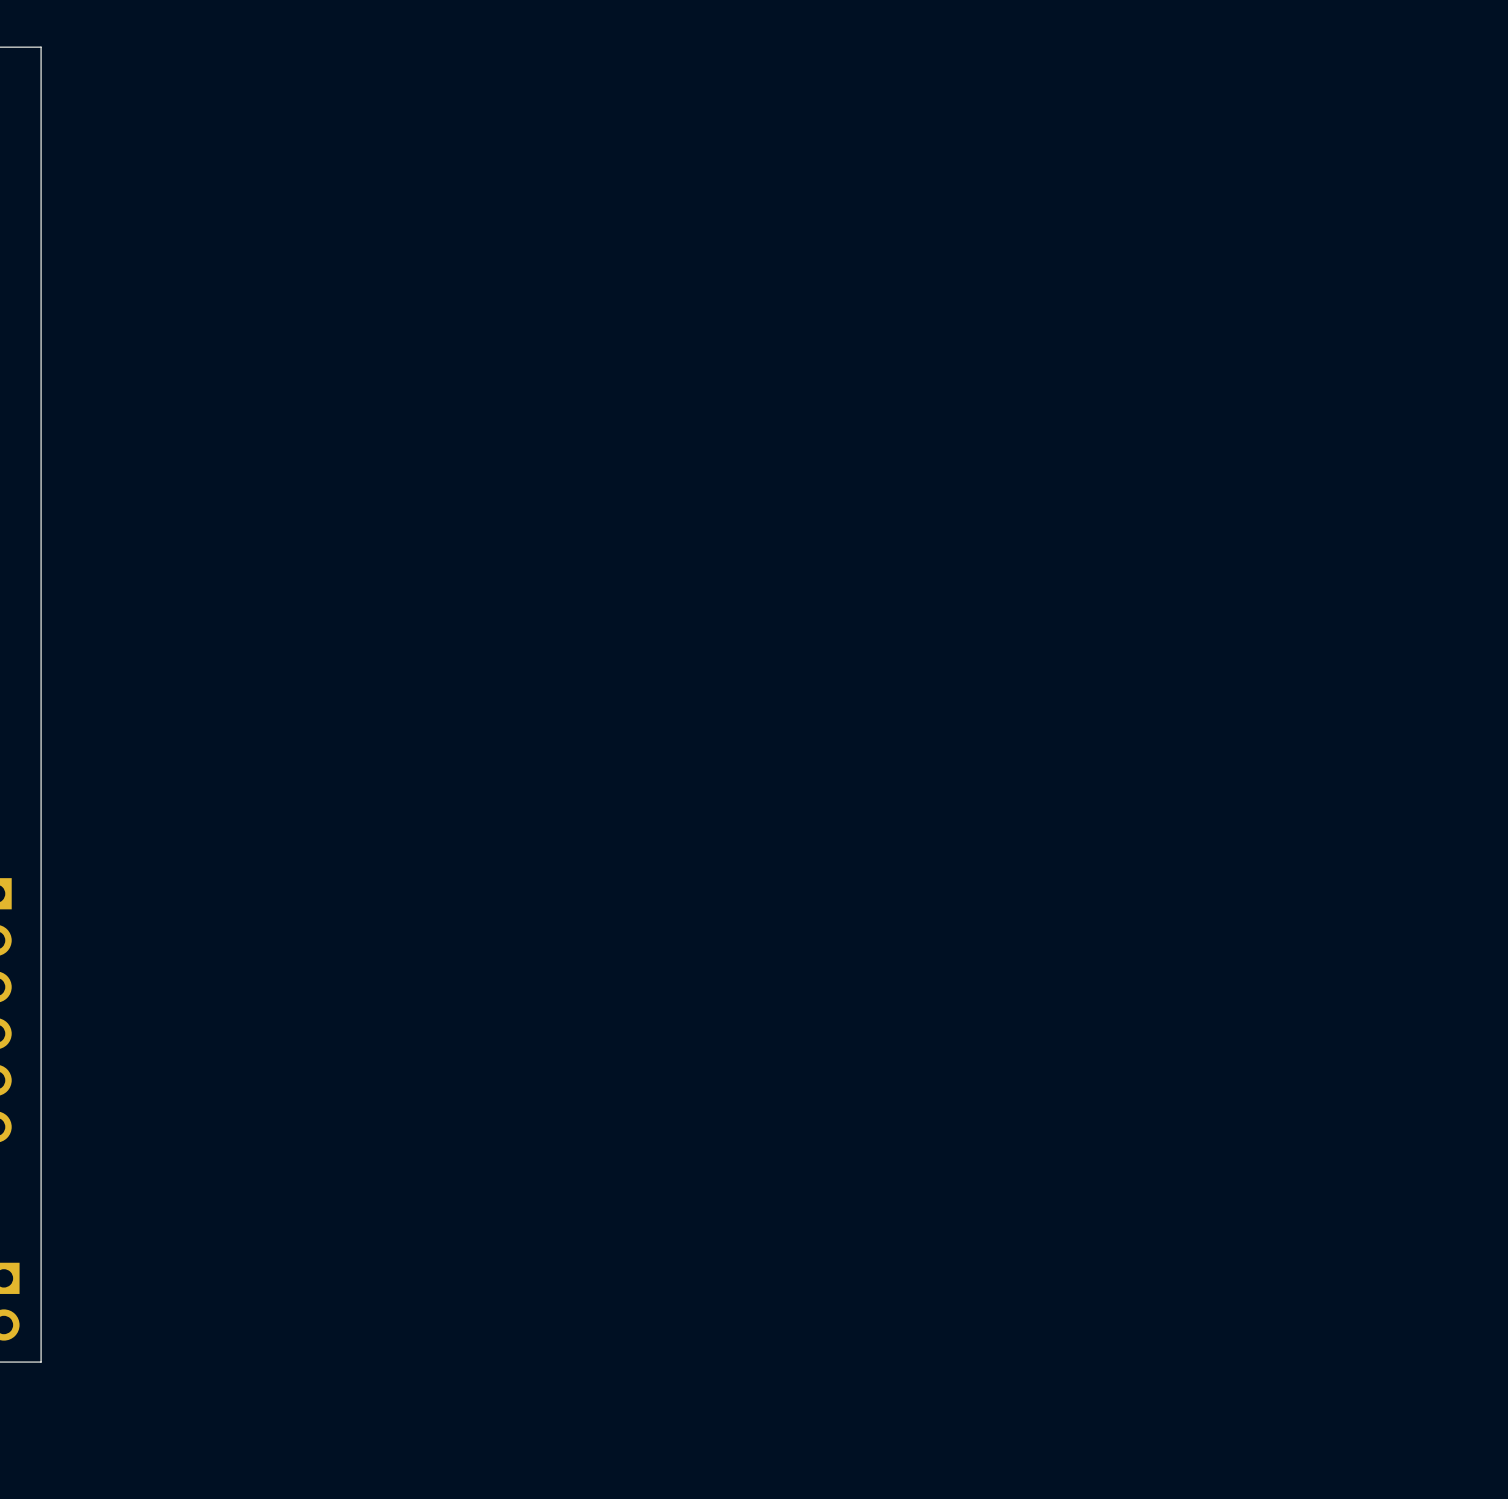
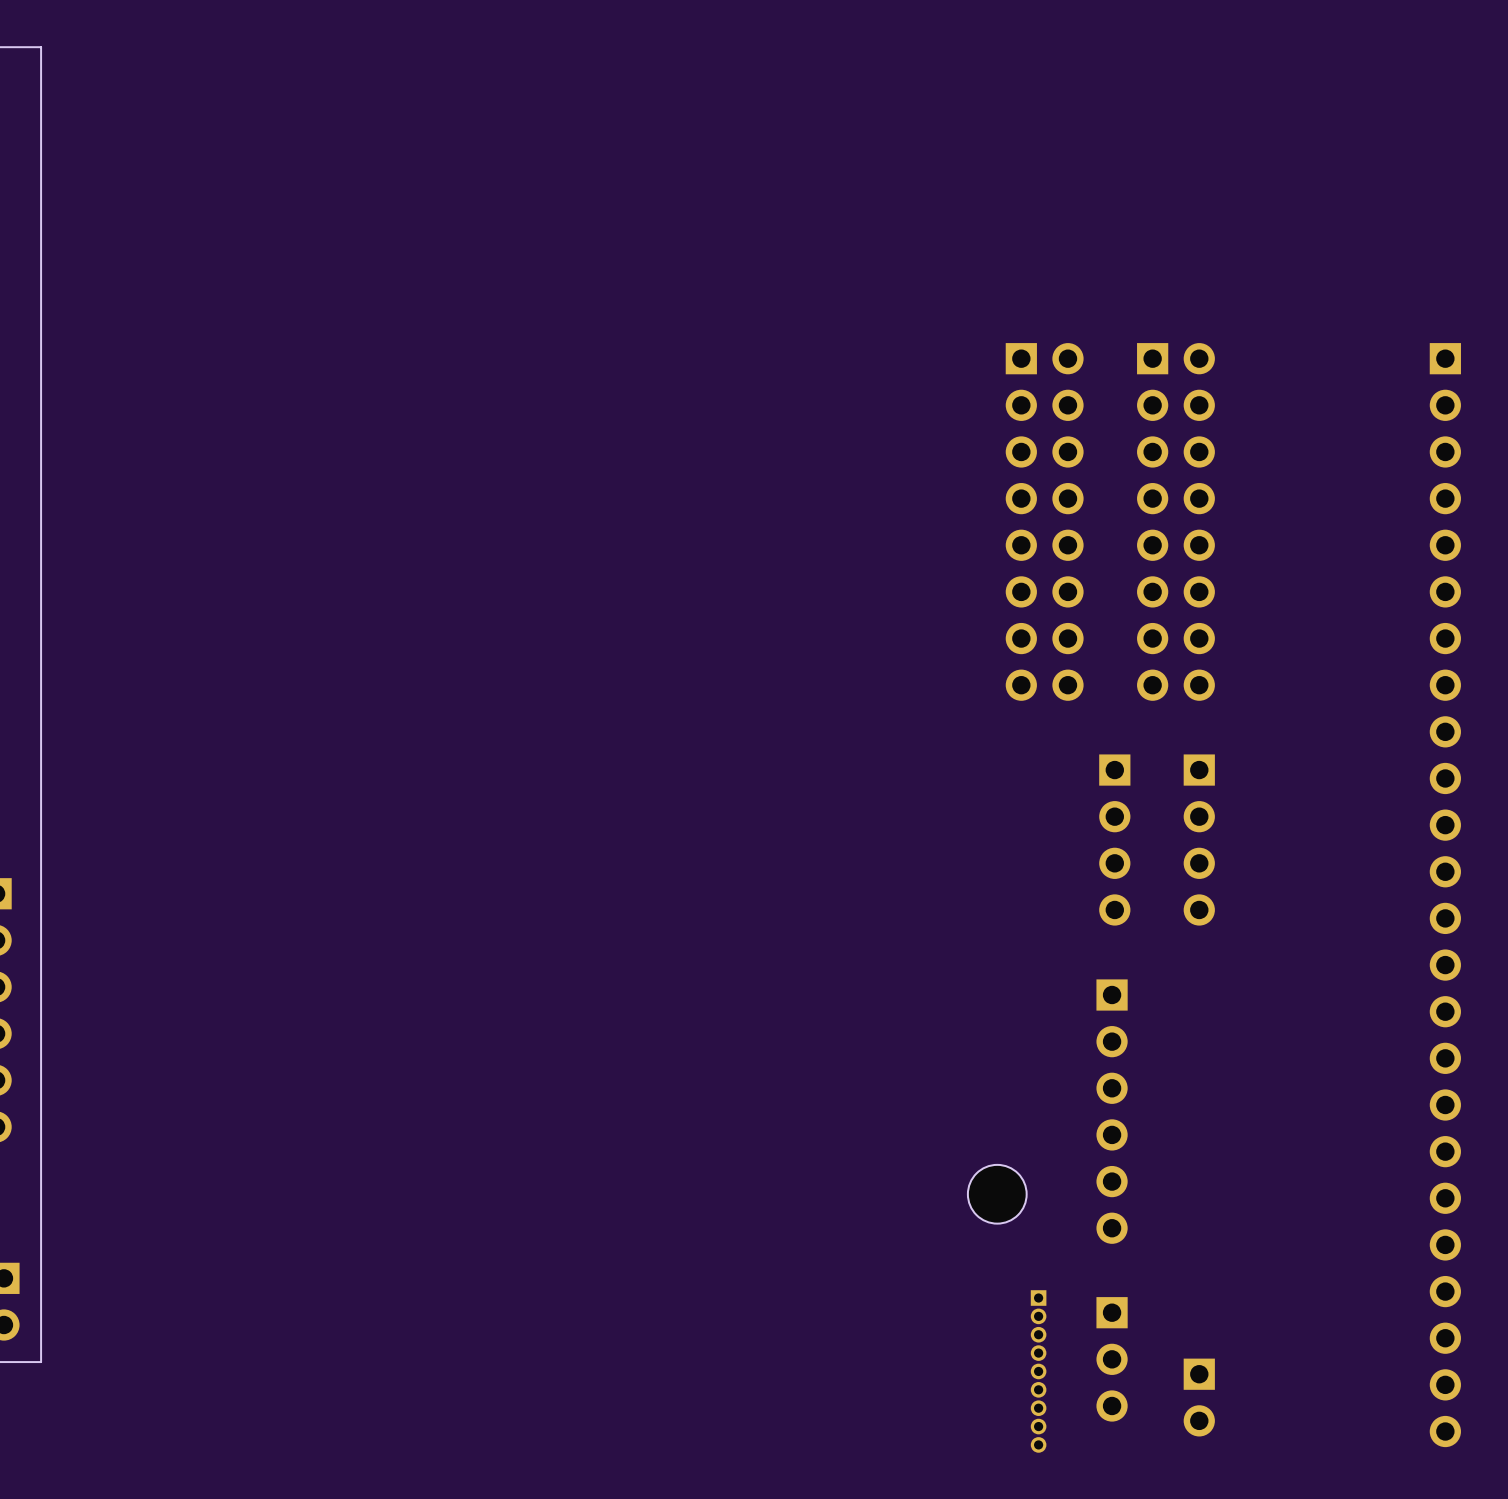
part: none -> (1044, 521)
part: none -> (1175, 521)
part: none -> (1114, 840)
part: none -> (1199, 840)
part: none -> (1445, 895)
part: none -> (1112, 1111)
part: none -> (997, 1194)
part: none -> (1112, 1359)
part: none -> (1038, 1371)
part: none -> (1199, 1397)

